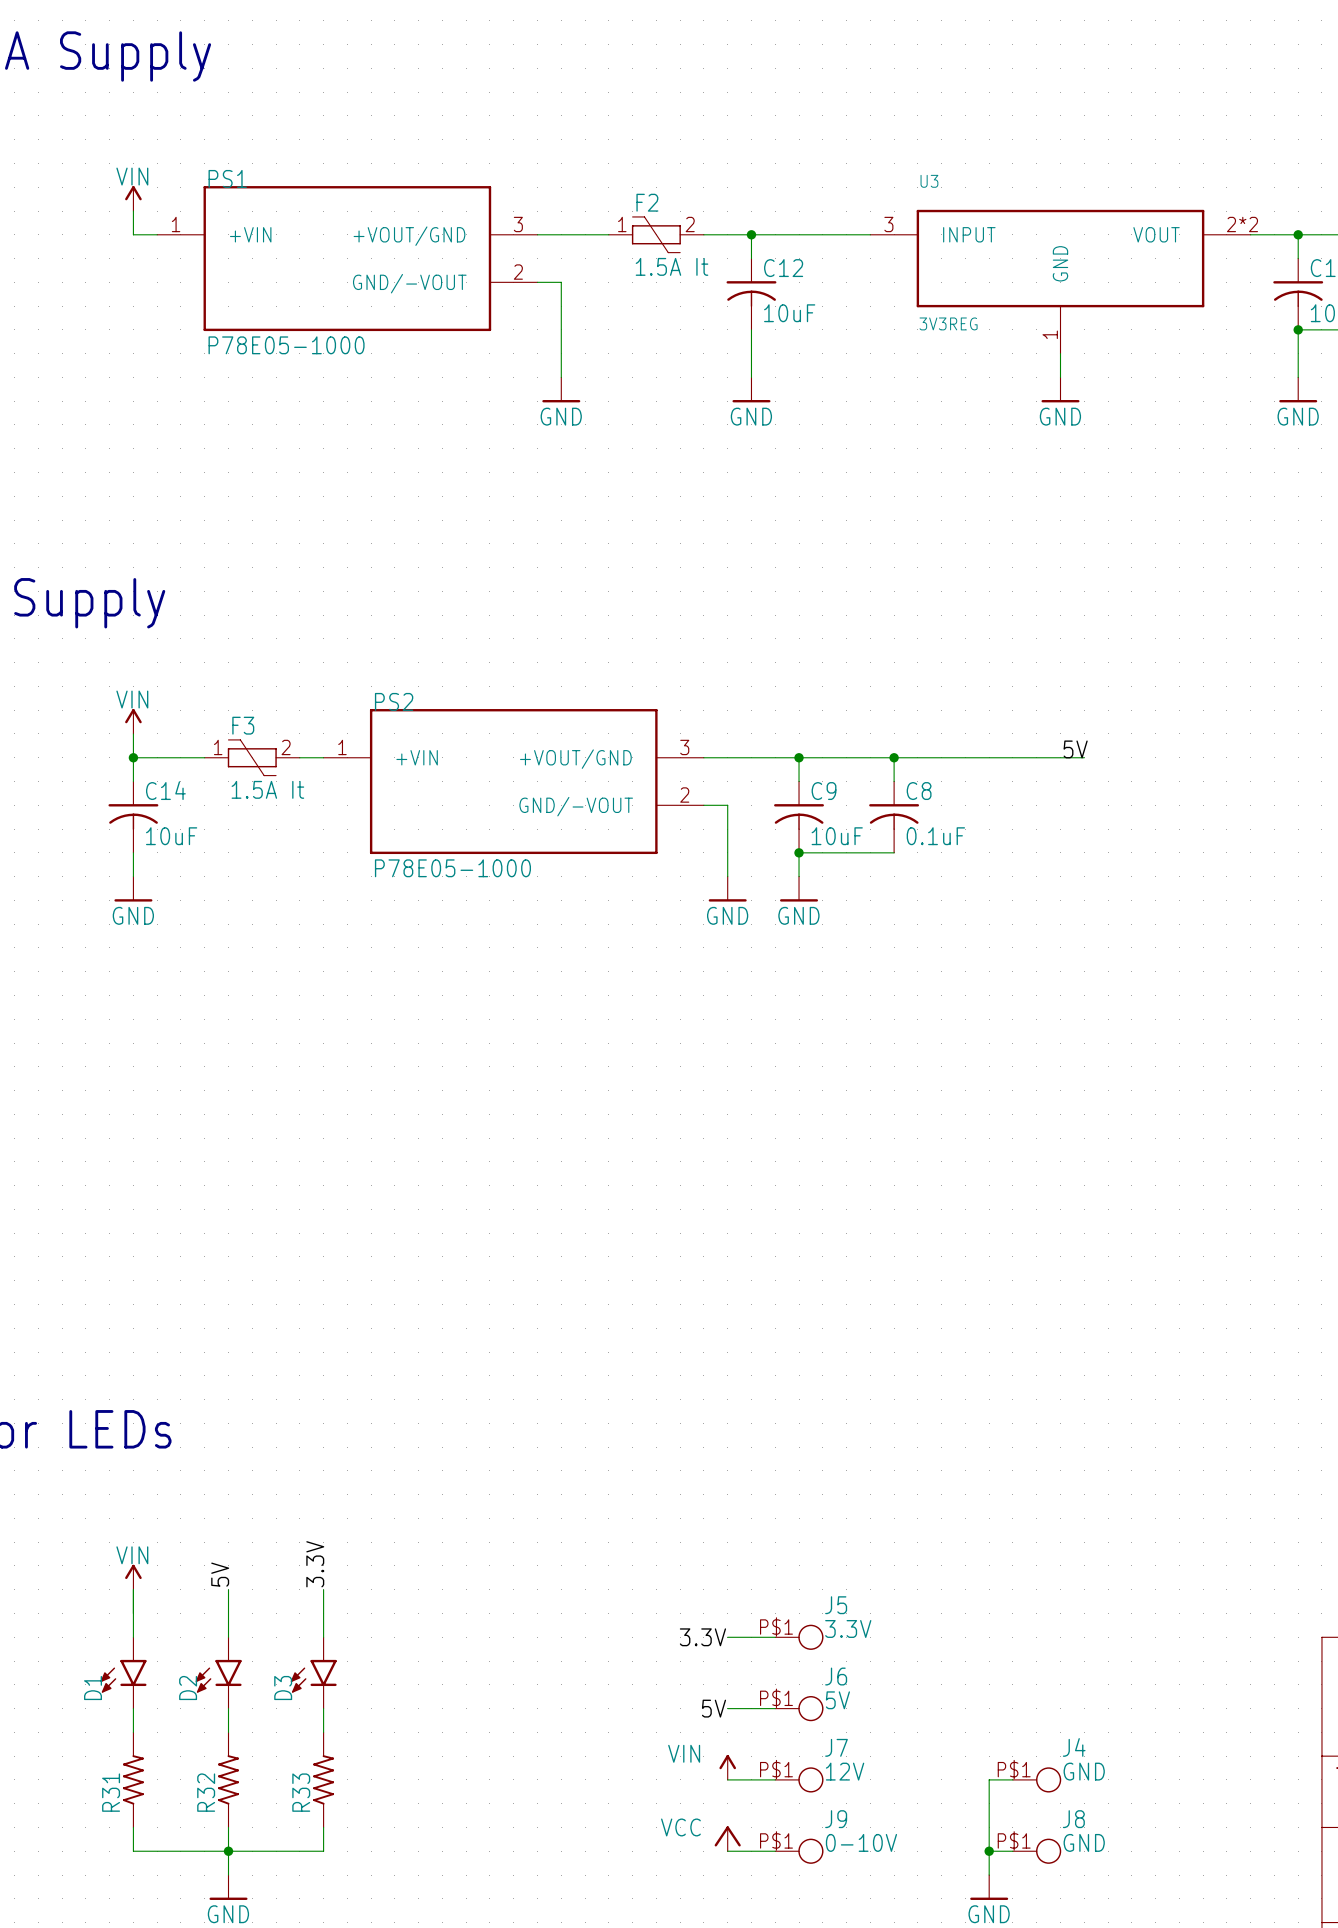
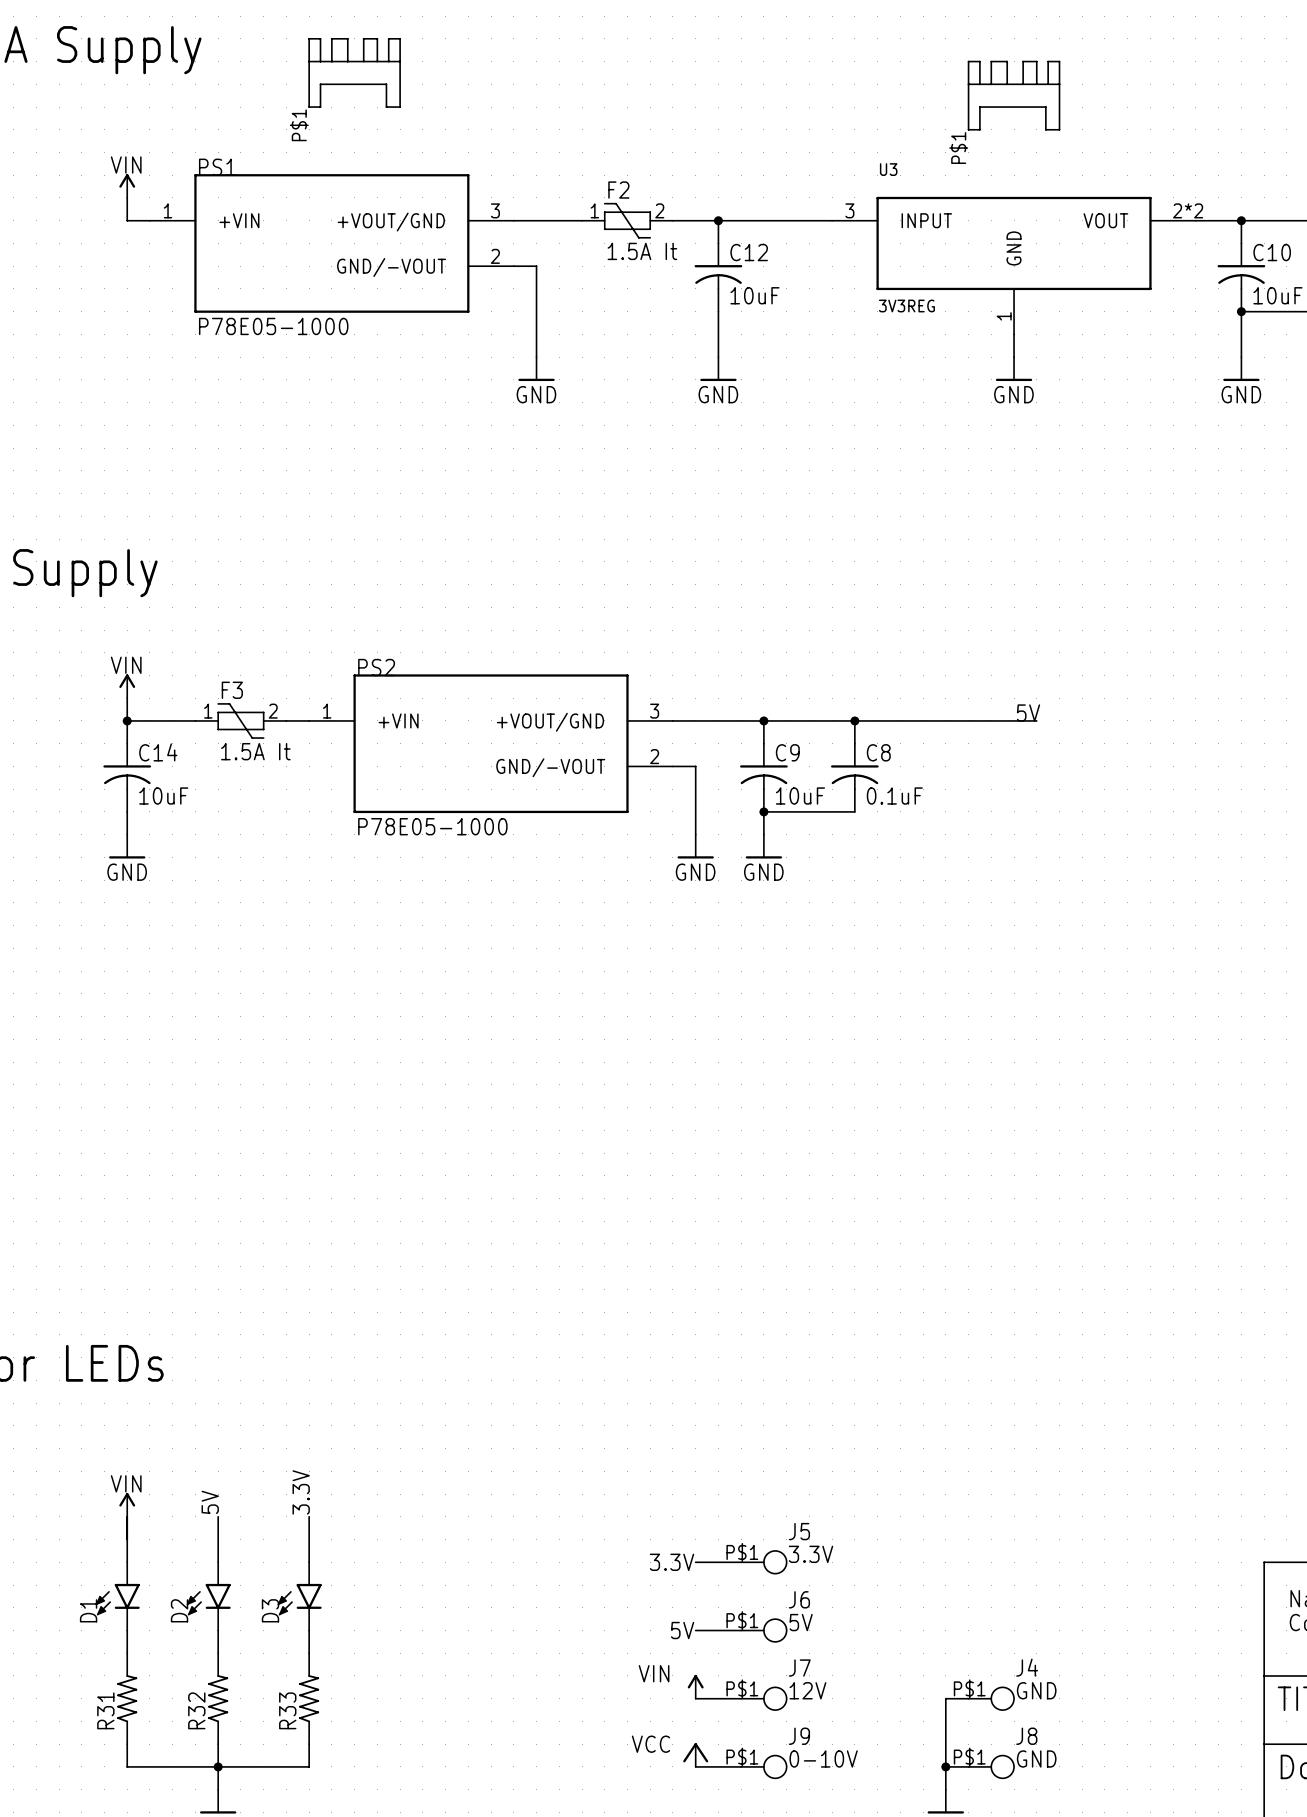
part: none -> (354, 72)
part: none -> (1014, 95)

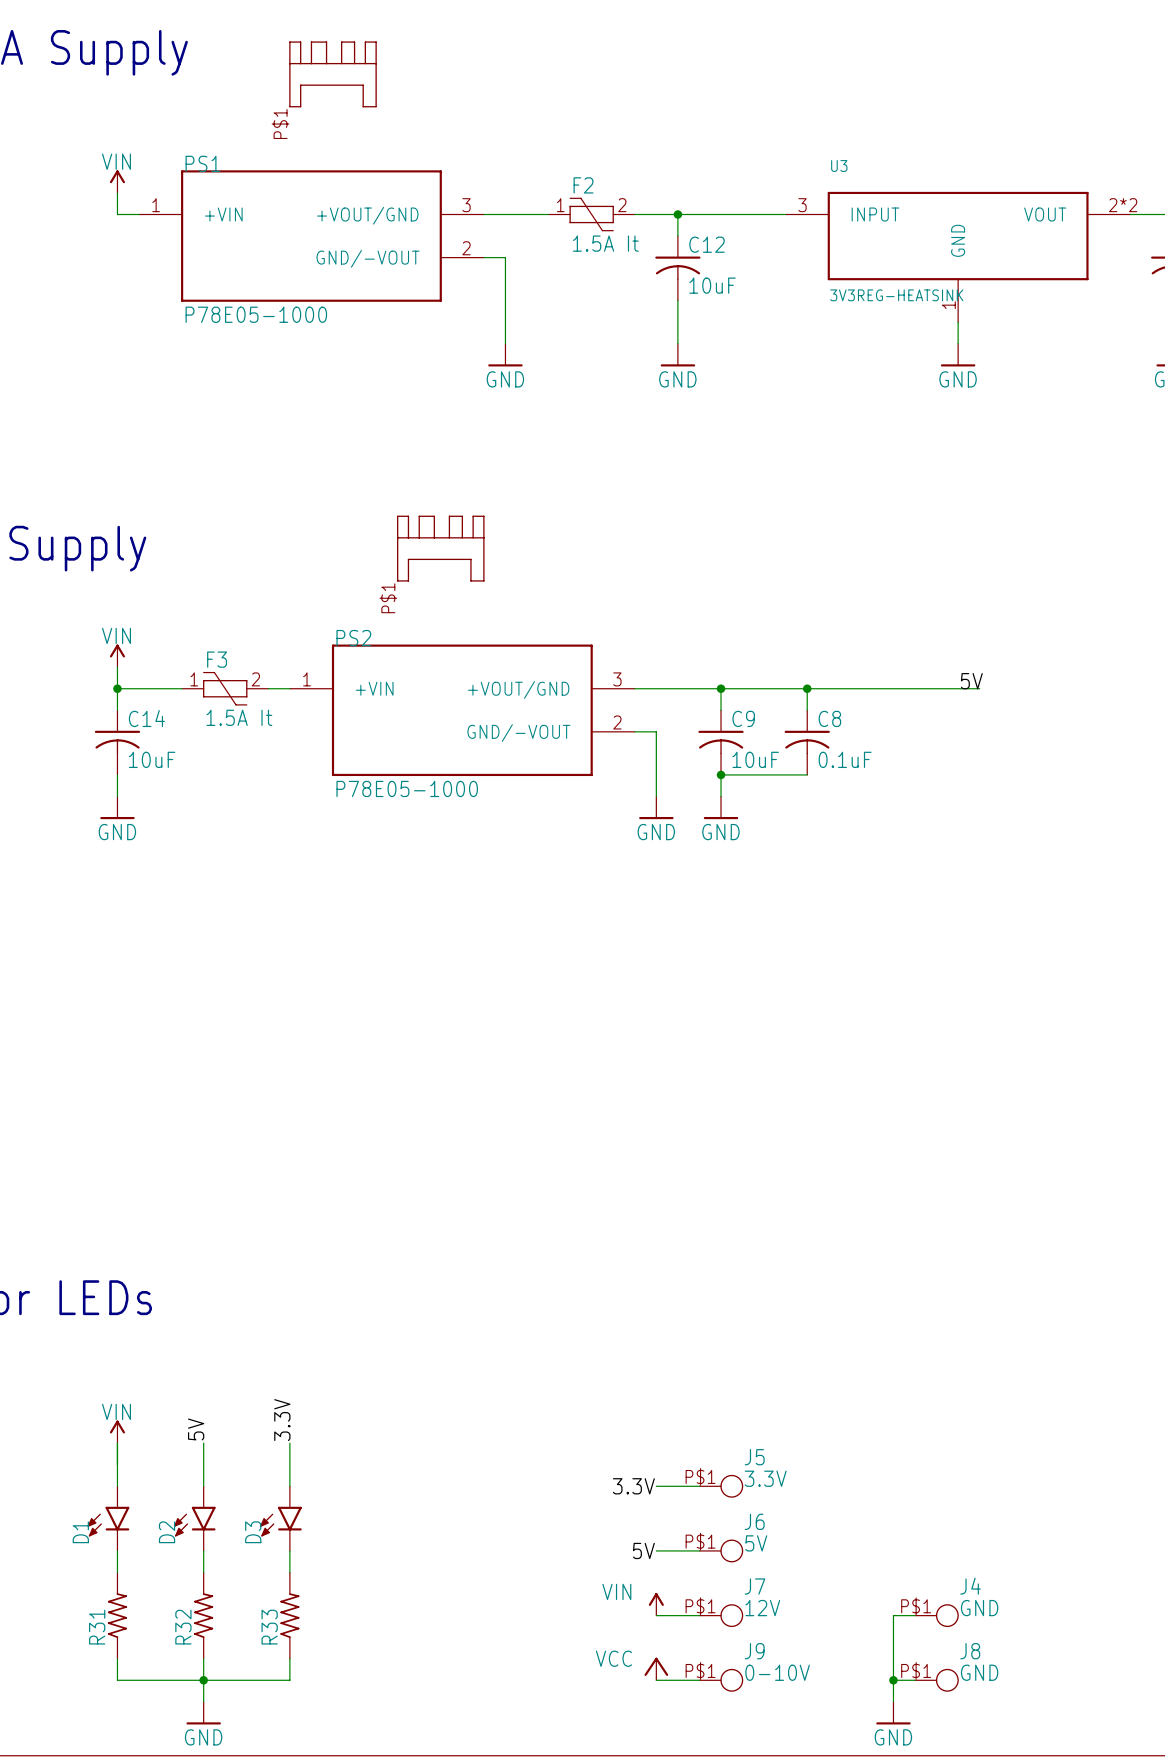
part: (1014, 95) -> none
U3 value: 3V3REG (906, 305) -> 3V3REG-HEATSINK (896, 295)
part: none -> (440, 548)

